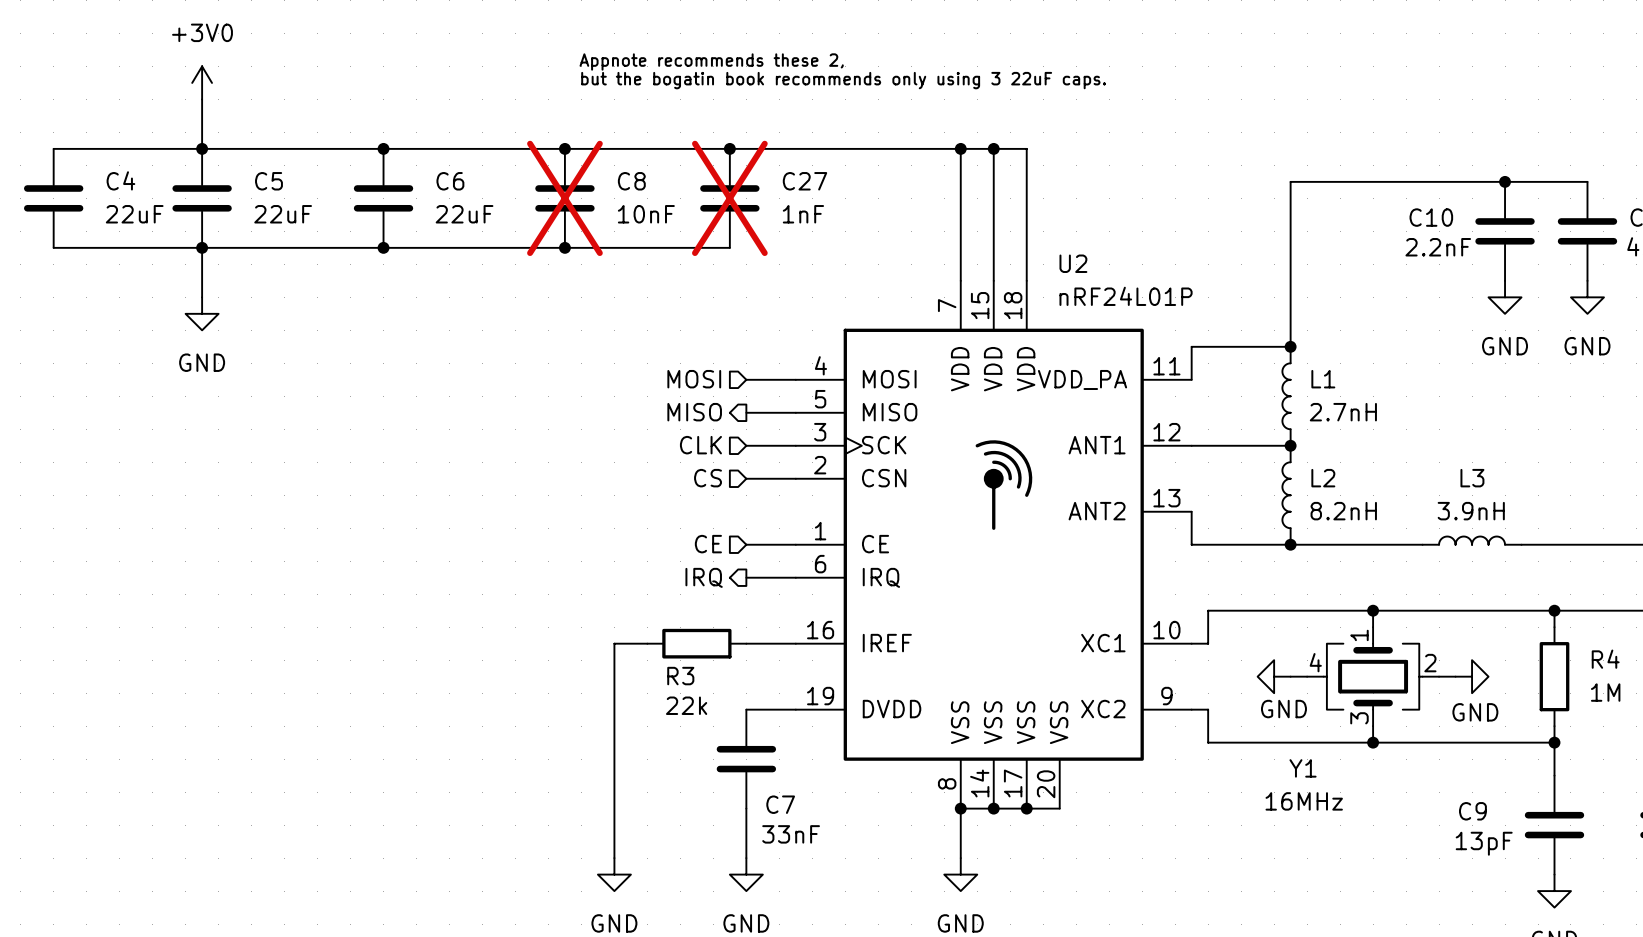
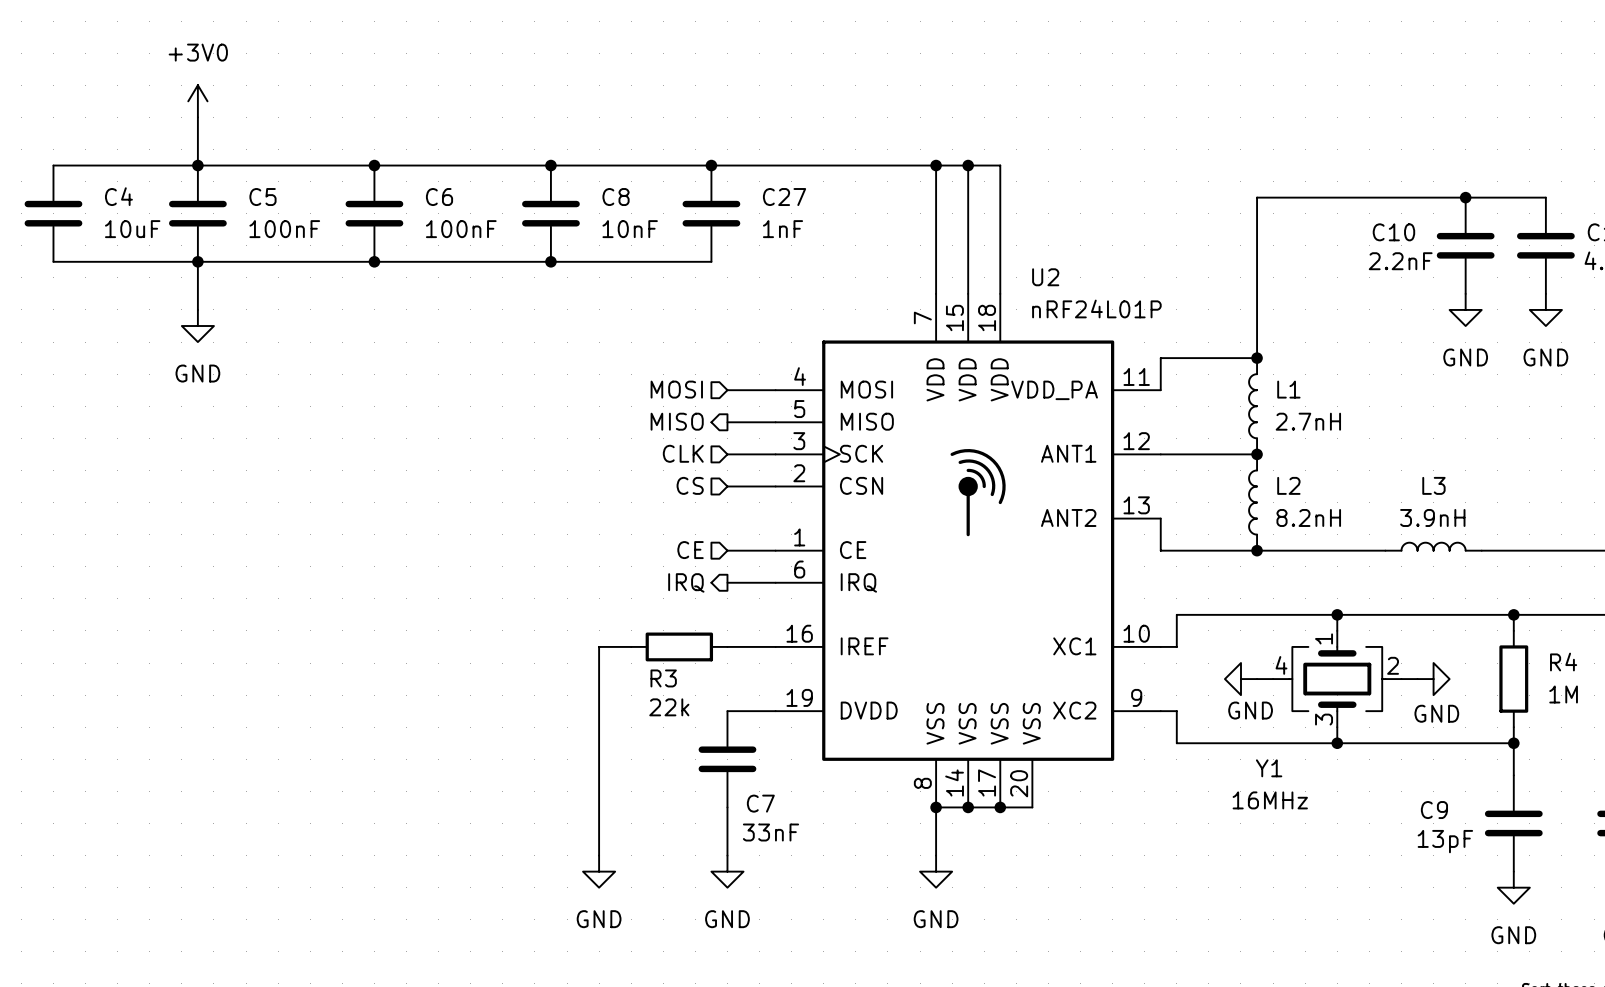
text: Appnote recommends these 2, (711, 61) -> none
text: but the bogatin book recommends only using 3 22uF caps. (843, 80) -> none
C8 do-not-place cross: (564, 198) -> none
C27 do-not-place cross: (729, 198) -> none
C4 value: 22uF (134, 214) -> 10uF (132, 229)
C5 value: 22uF (283, 214) -> 100nF (284, 229)
C6 value: 22uF (464, 214) -> 100nF (461, 229)

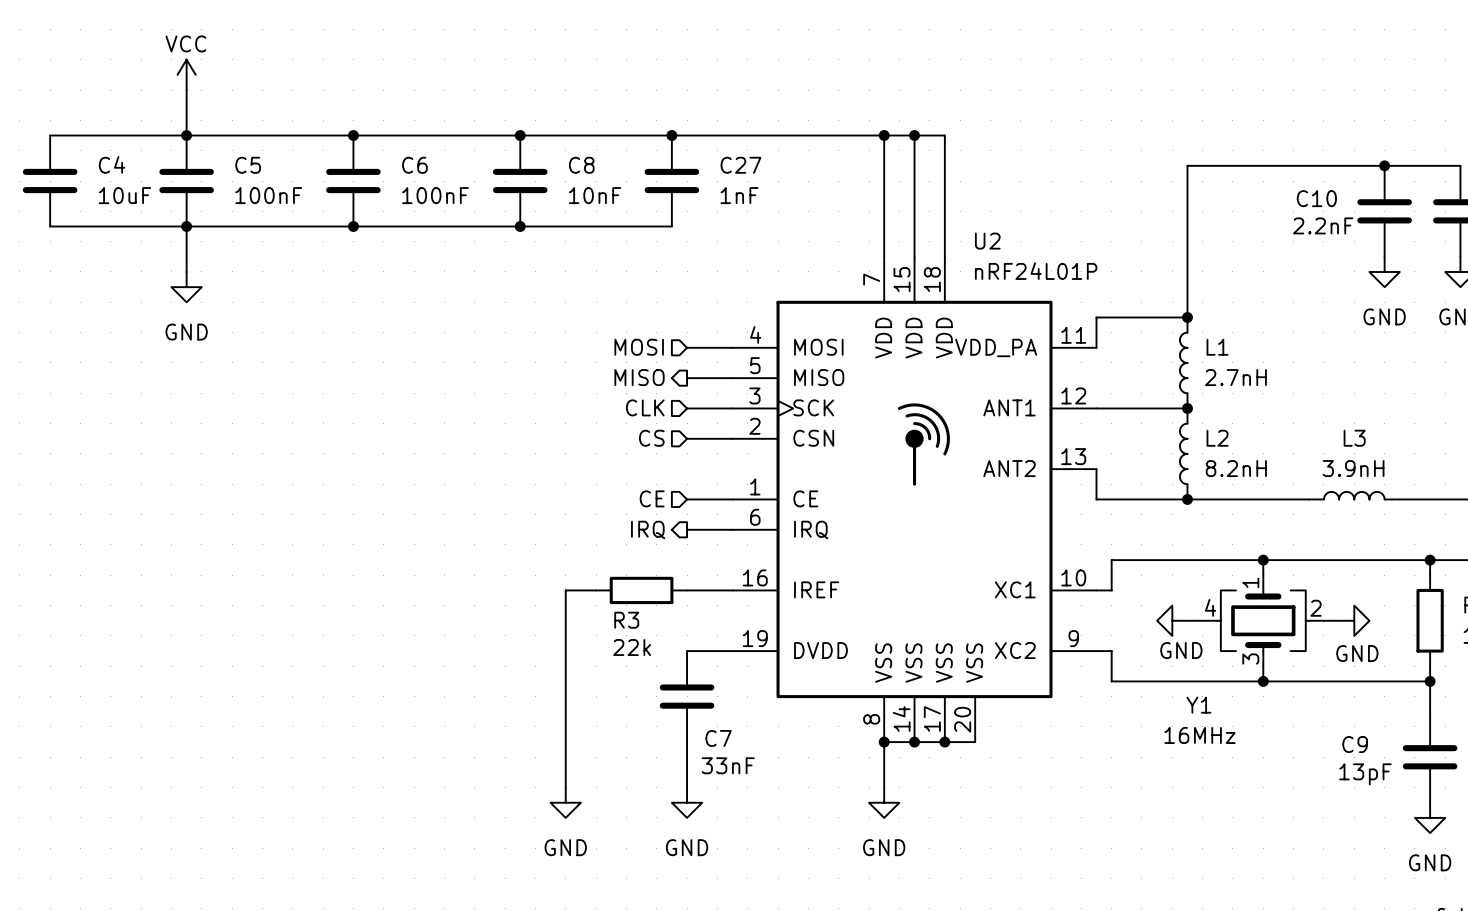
power symbol: +3V0 (197, 101) -> VCC (186, 74)

